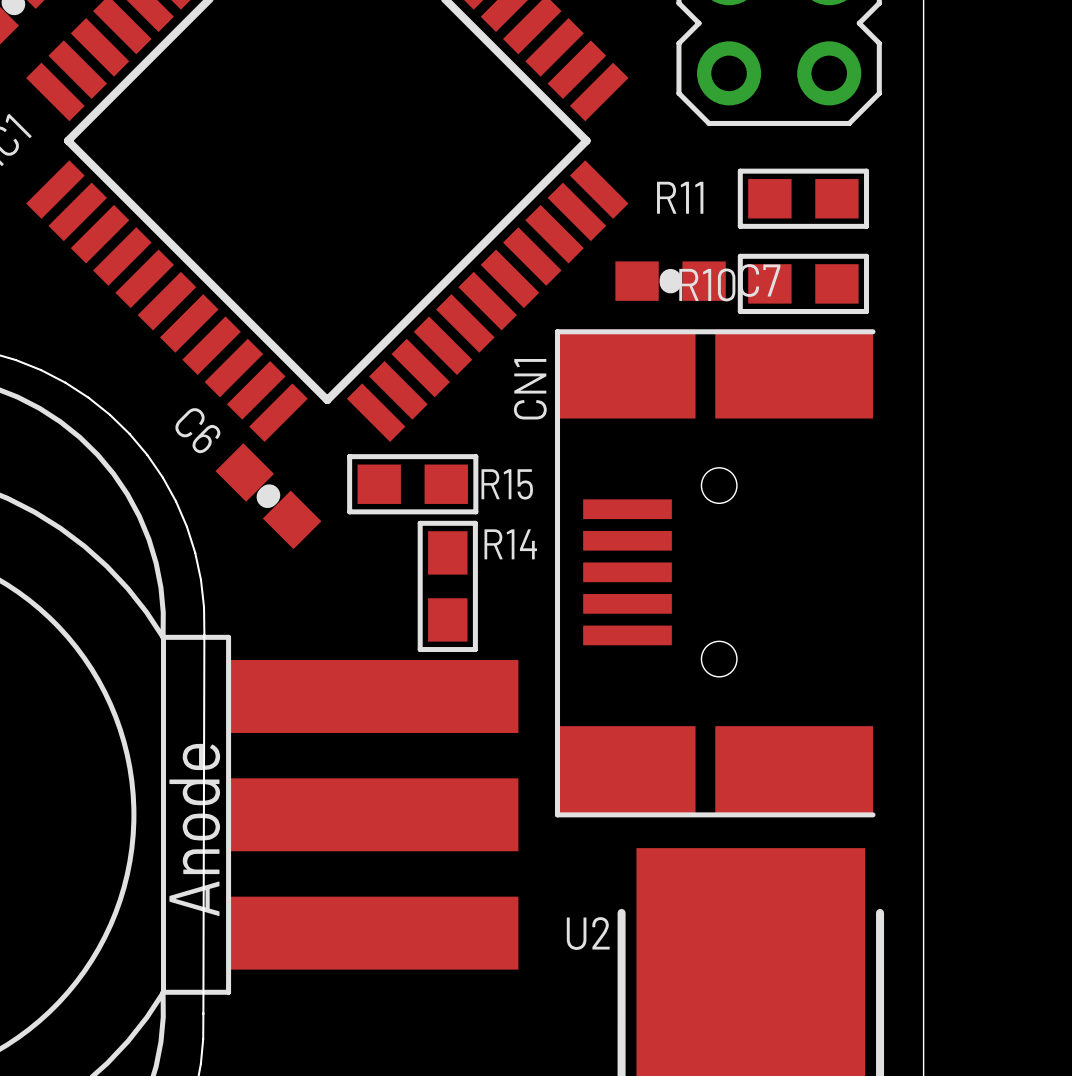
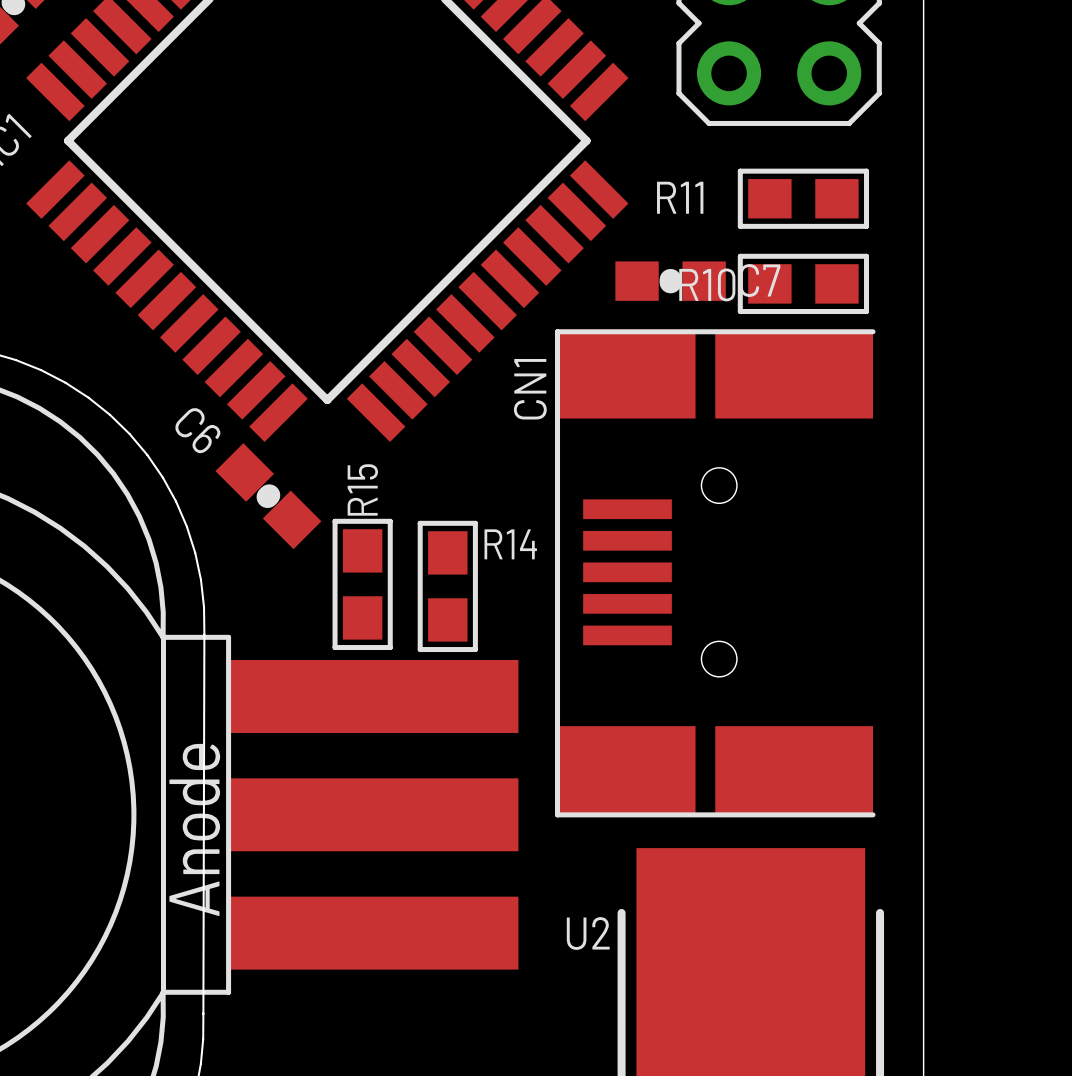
R15 rotation: 0° (412, 484) -> 90° clockwise (362, 584)
R15 position: (412, 484) -> (362, 584)
R15 name position: R15 (507, 484) -> R15 (362, 489)

